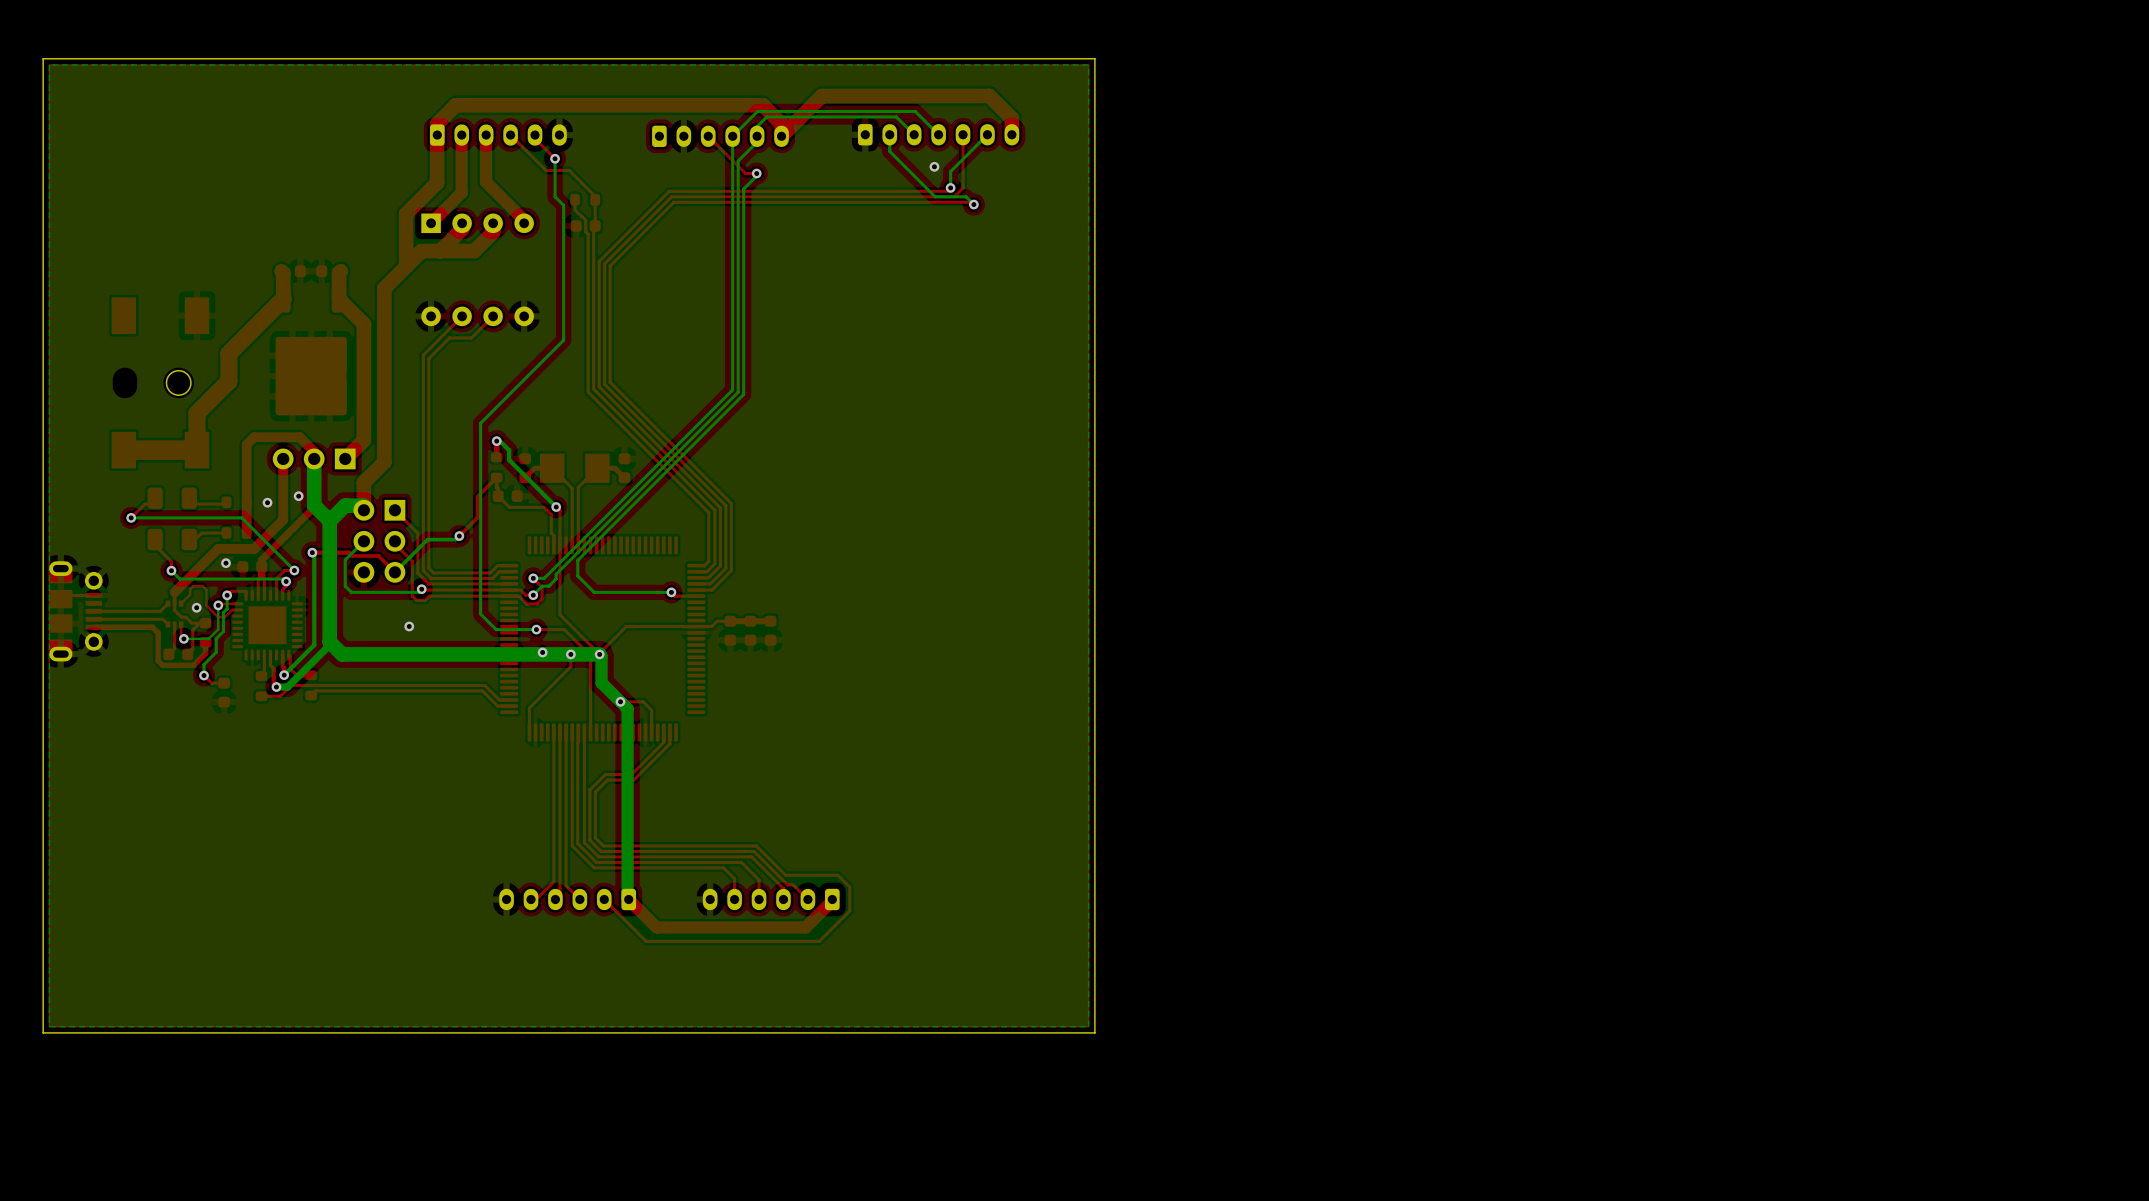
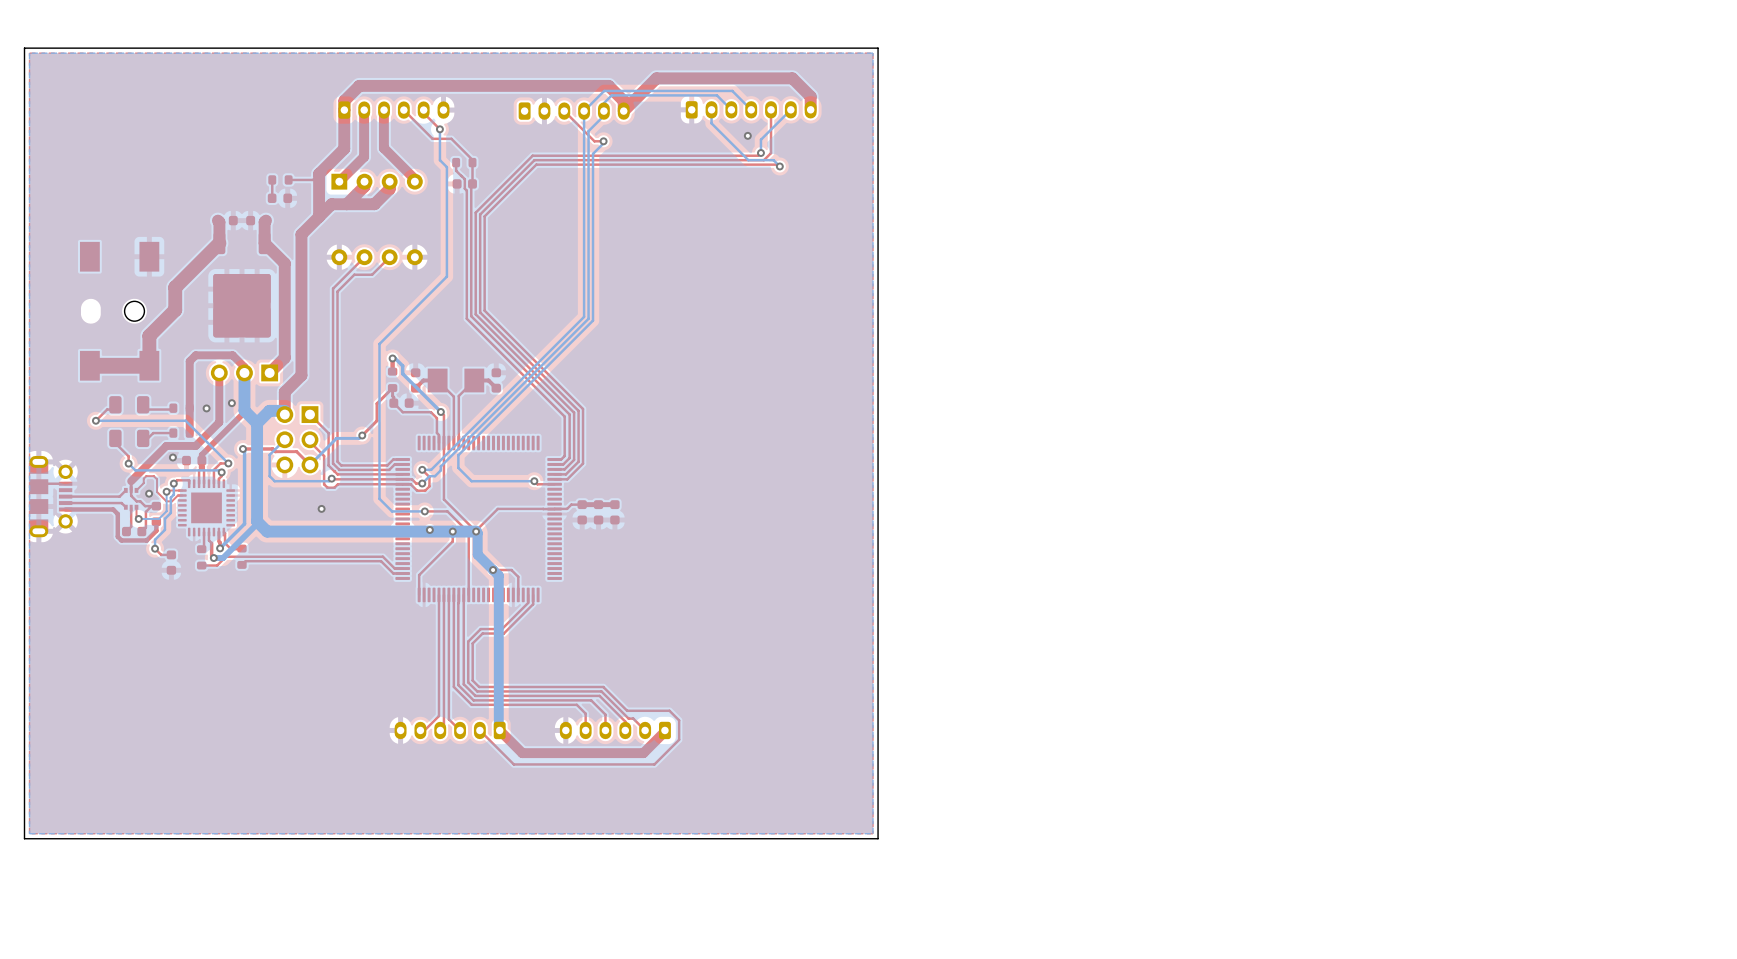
top track: none -> (318, 173) (313, 179) (288, 179)
top track: none -> (272, 179) (272, 198)
part: none -> (280, 179)
part: none -> (279, 198)

